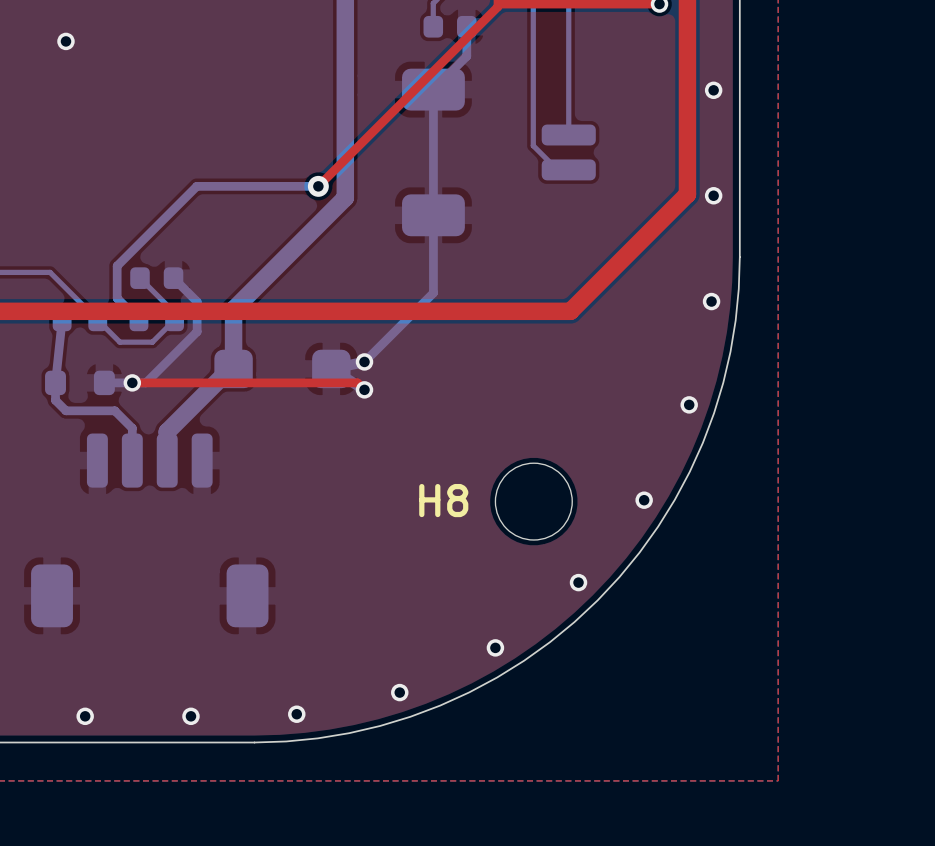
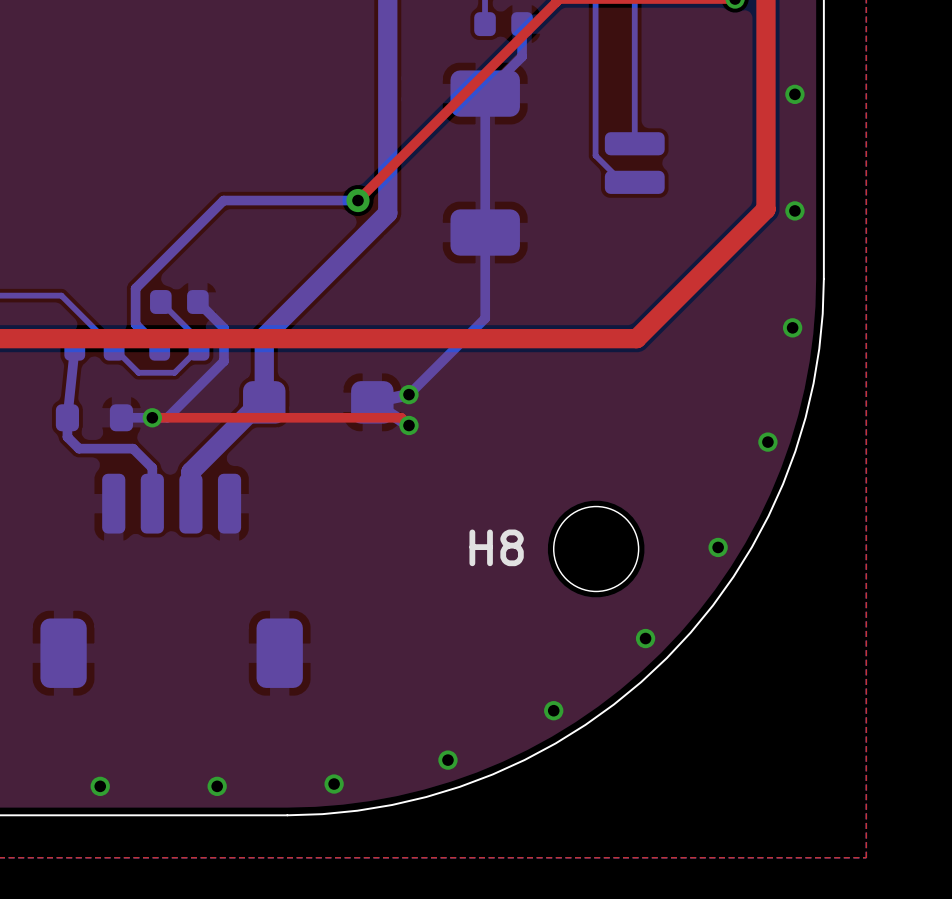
via: (65, 41) -> none

